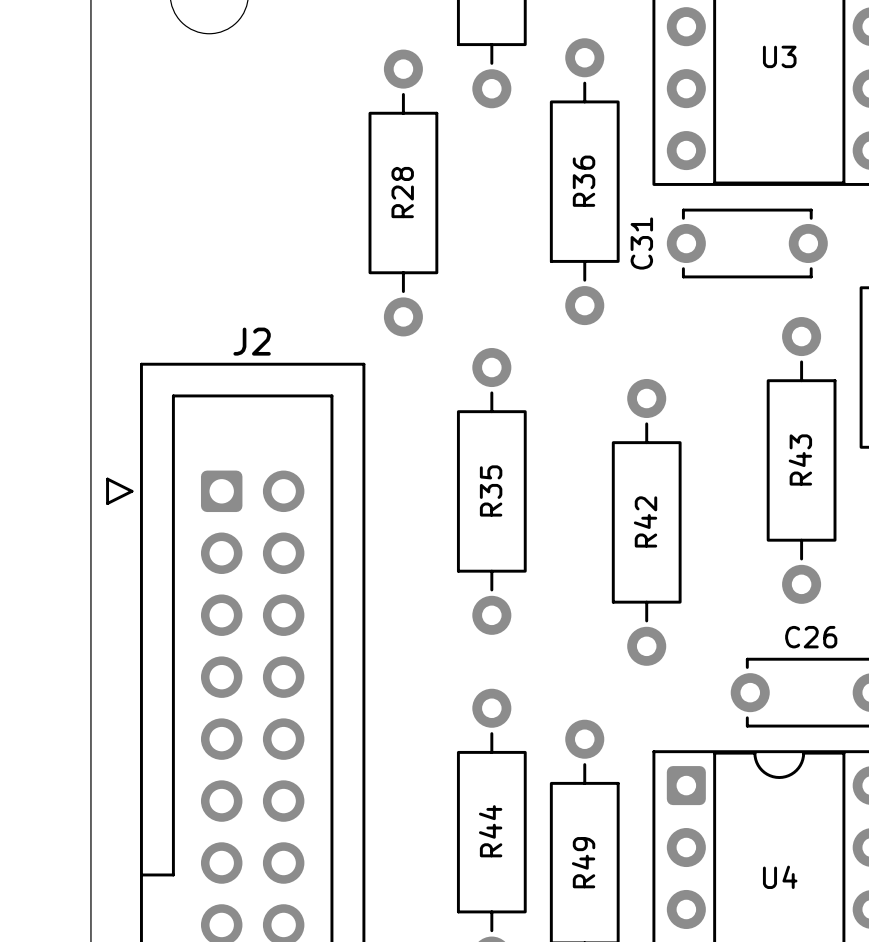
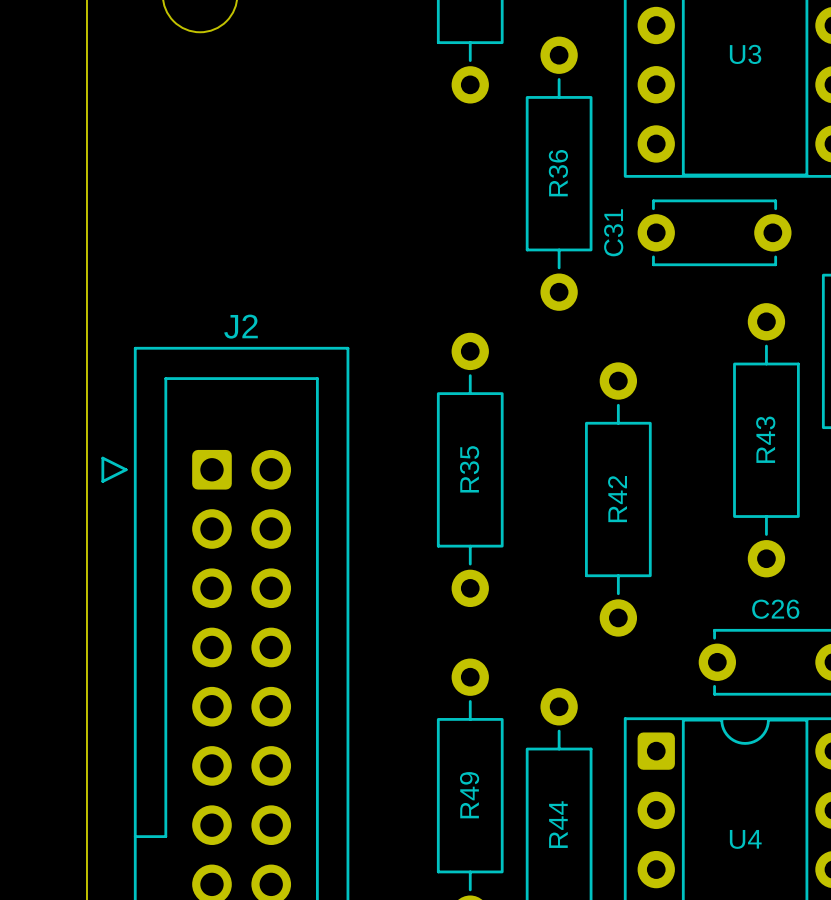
R28: (403, 193) -> none
R44 name: R44 (490, 831) -> R49 (469, 795)
R49 name: R49 (583, 862) -> R44 (558, 824)

